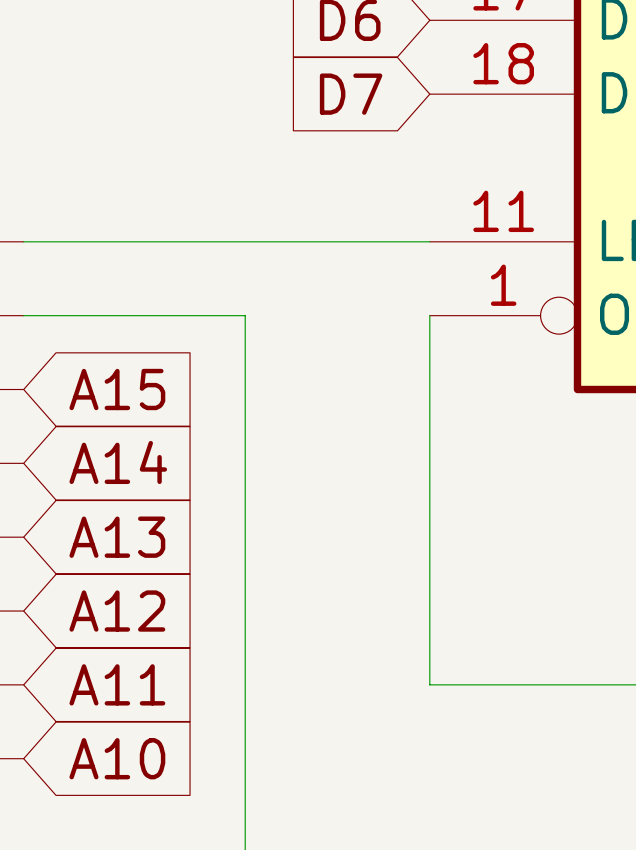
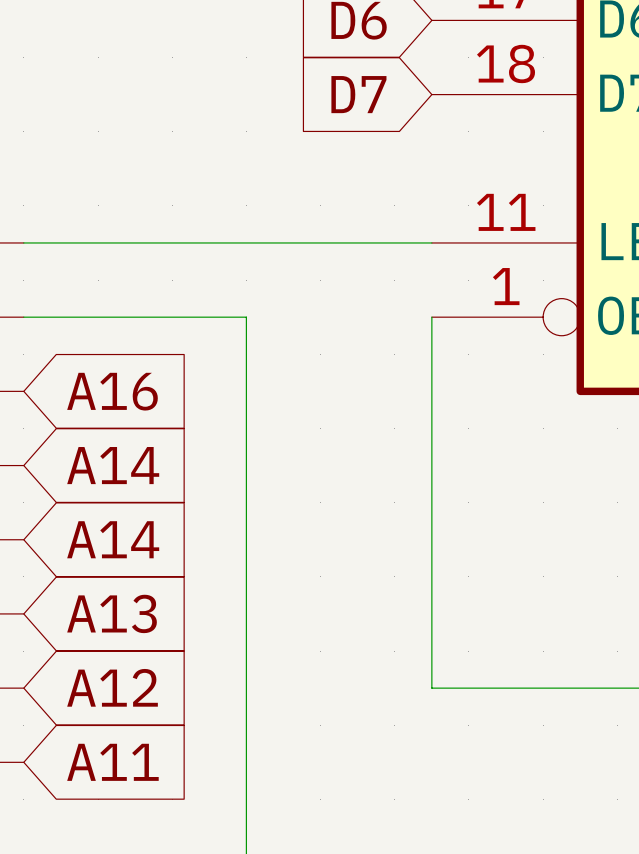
global label: A15 (117, 389) -> A16 (112, 391)
global label: A13 (117, 537) -> A14 (113, 539)
global label: A12 (117, 611) -> A13 (112, 613)
global label: A11 (117, 684) -> A12 (112, 687)
global label: A10 (117, 758) -> A11 (112, 762)

